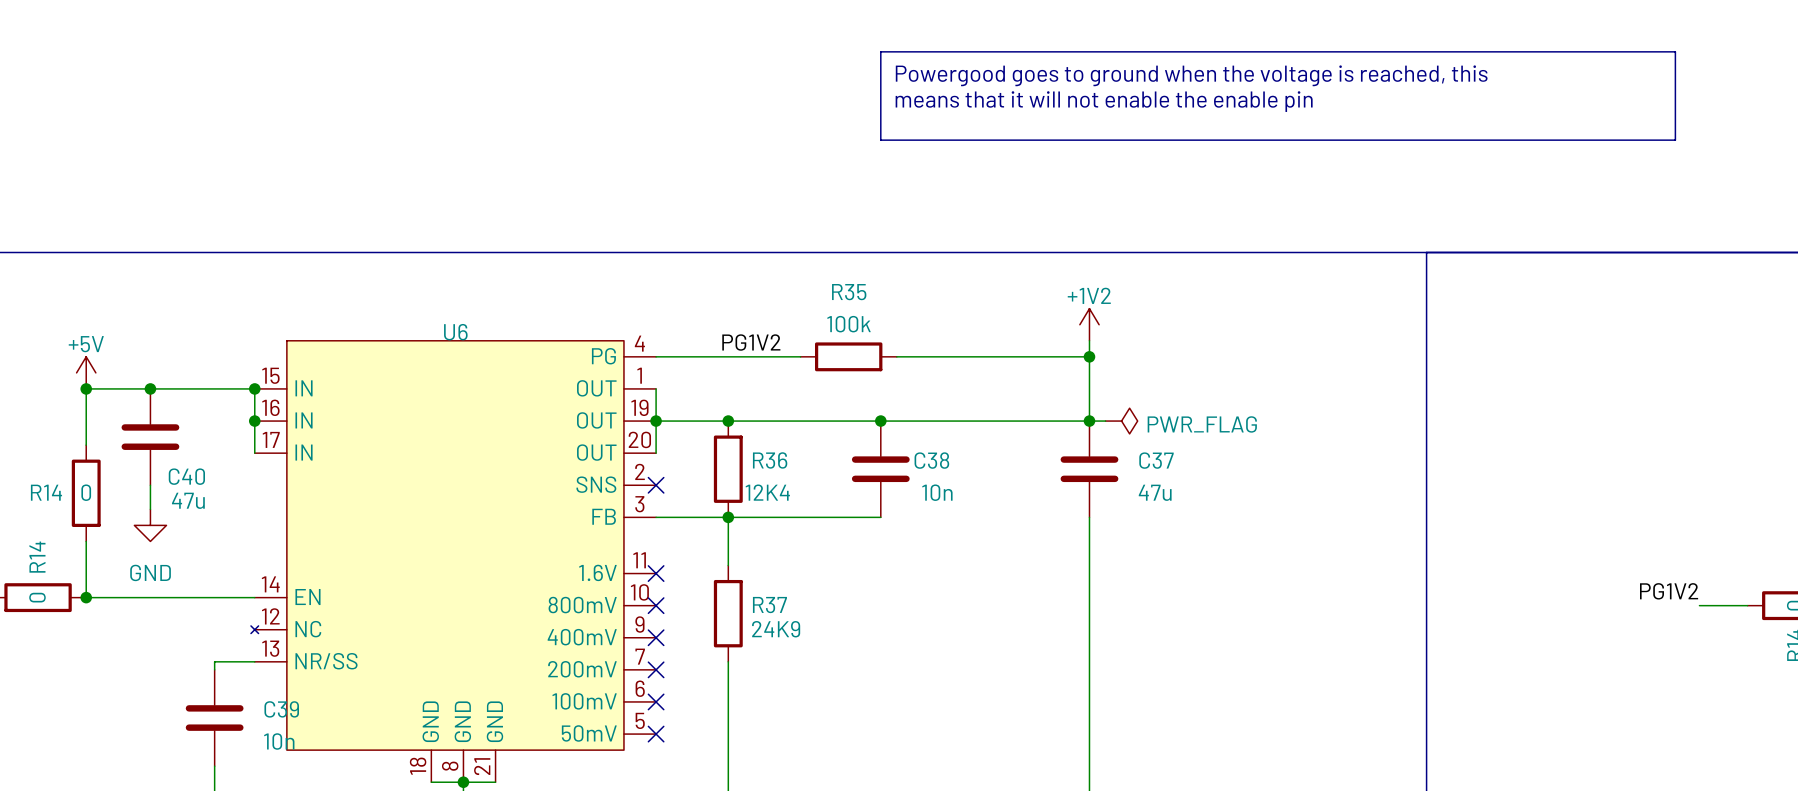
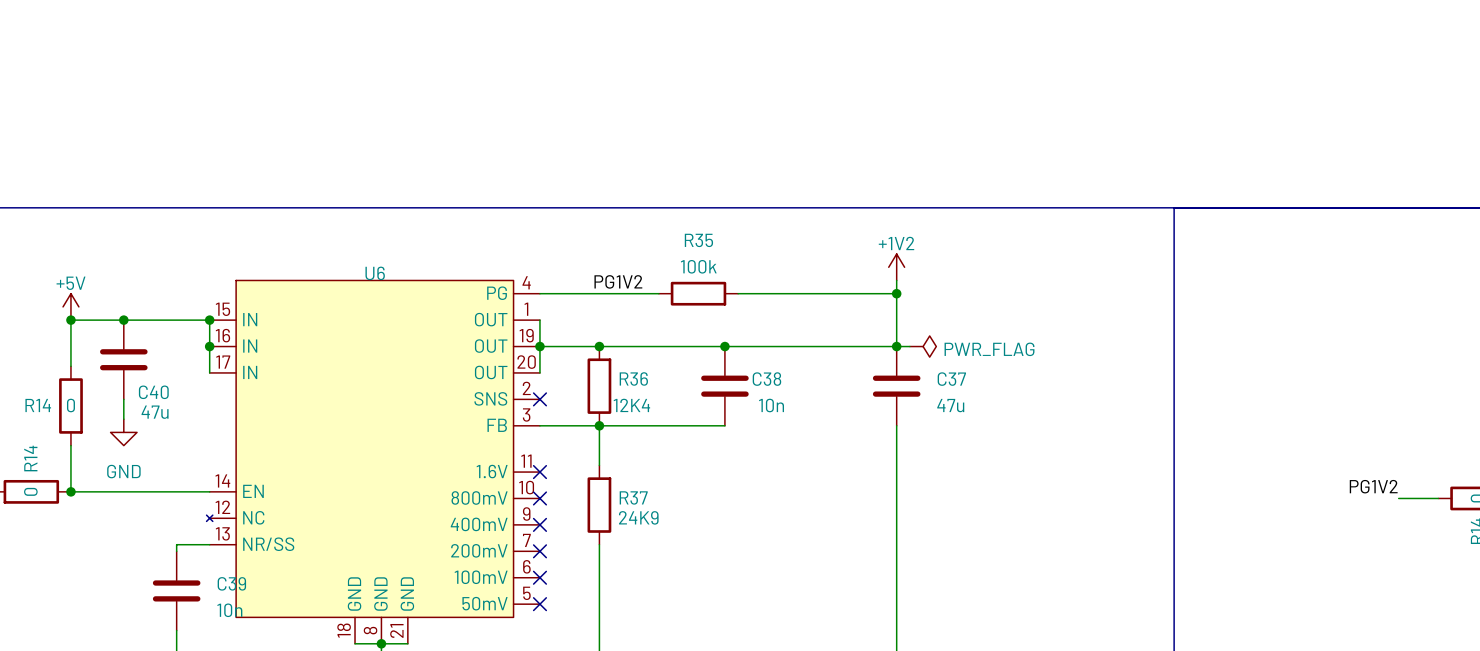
line: (880, 51) (1675, 51) (1675, 140) (880, 140) (880, 51) -> none
text: Powergood goes to ground when the voltage is reached, this (1191, 75) -> none
text: means that it will not enable the enable pin (1104, 101) -> none

